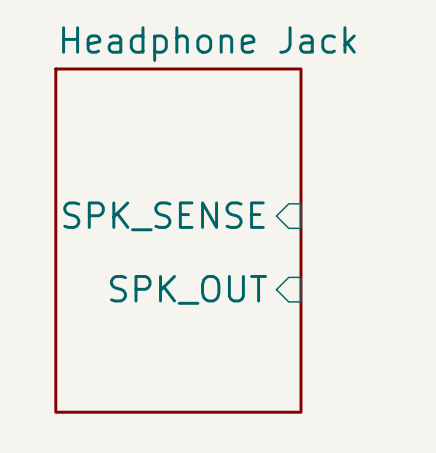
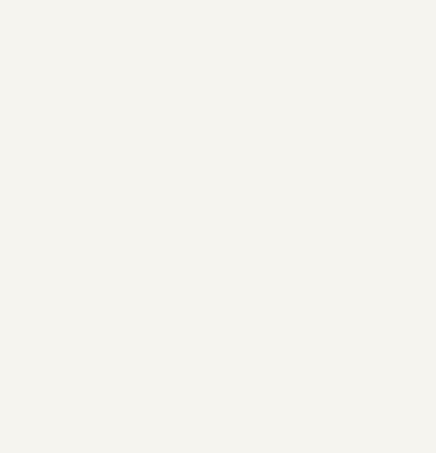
sheet pin: SPK_SENSE (164, 216) -> none
sheet Headphone Jack: (178, 240) -> none
sheet pin: SPK_OUT (188, 289) -> none

